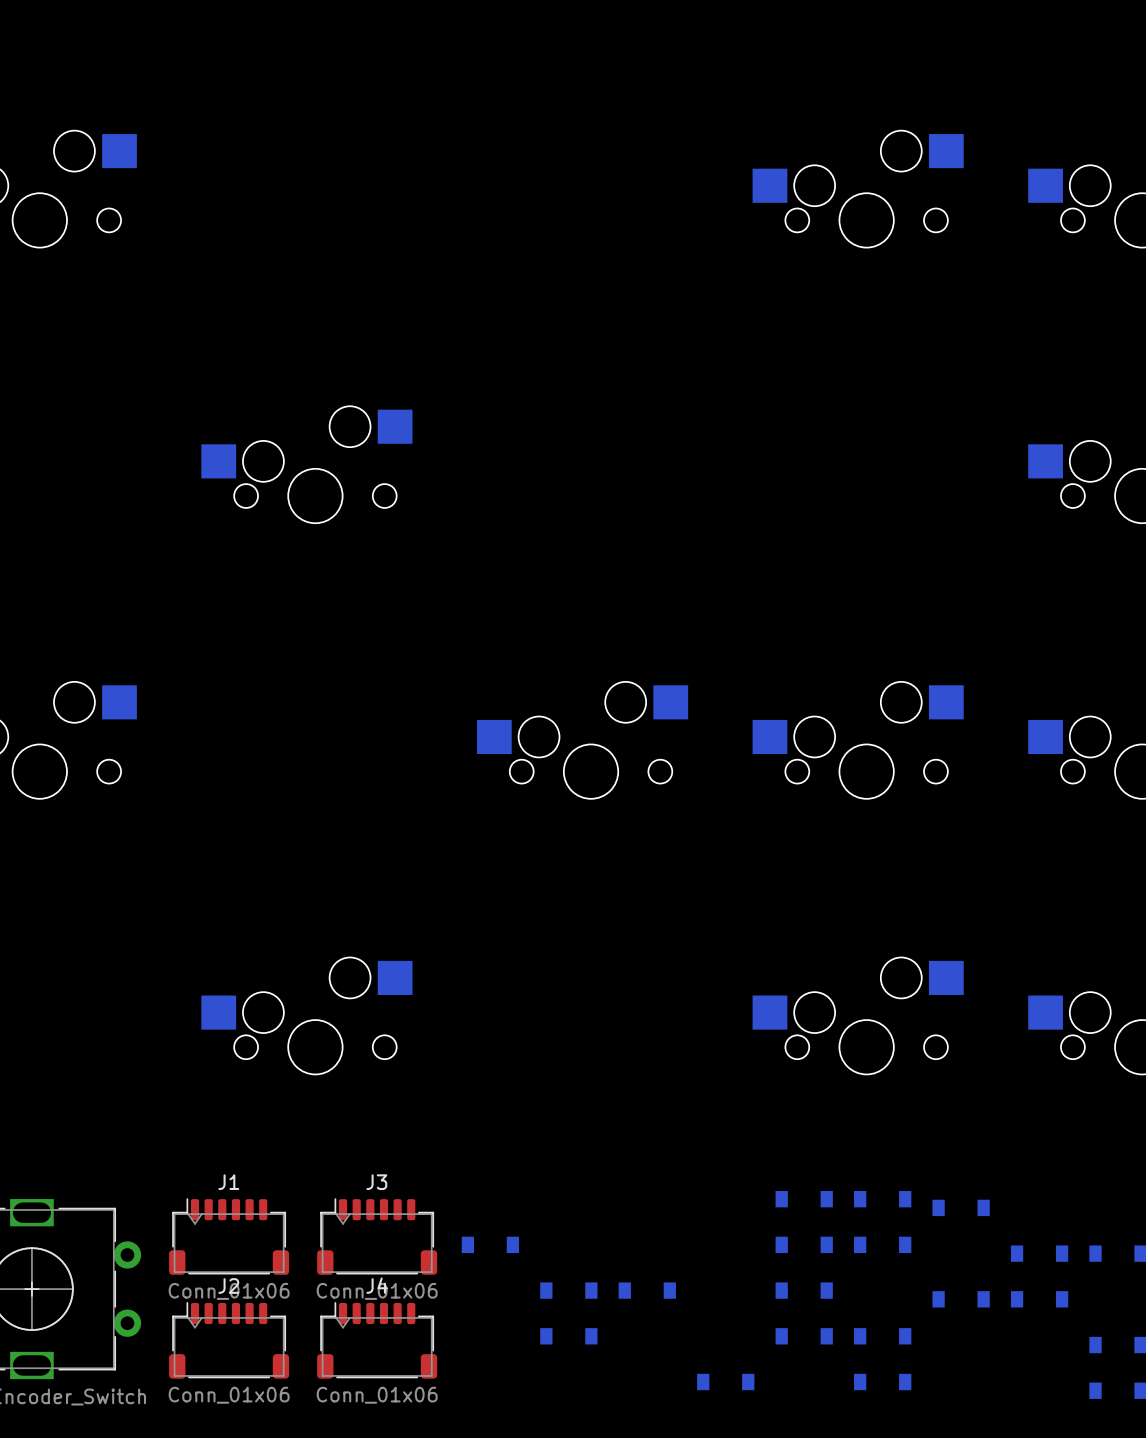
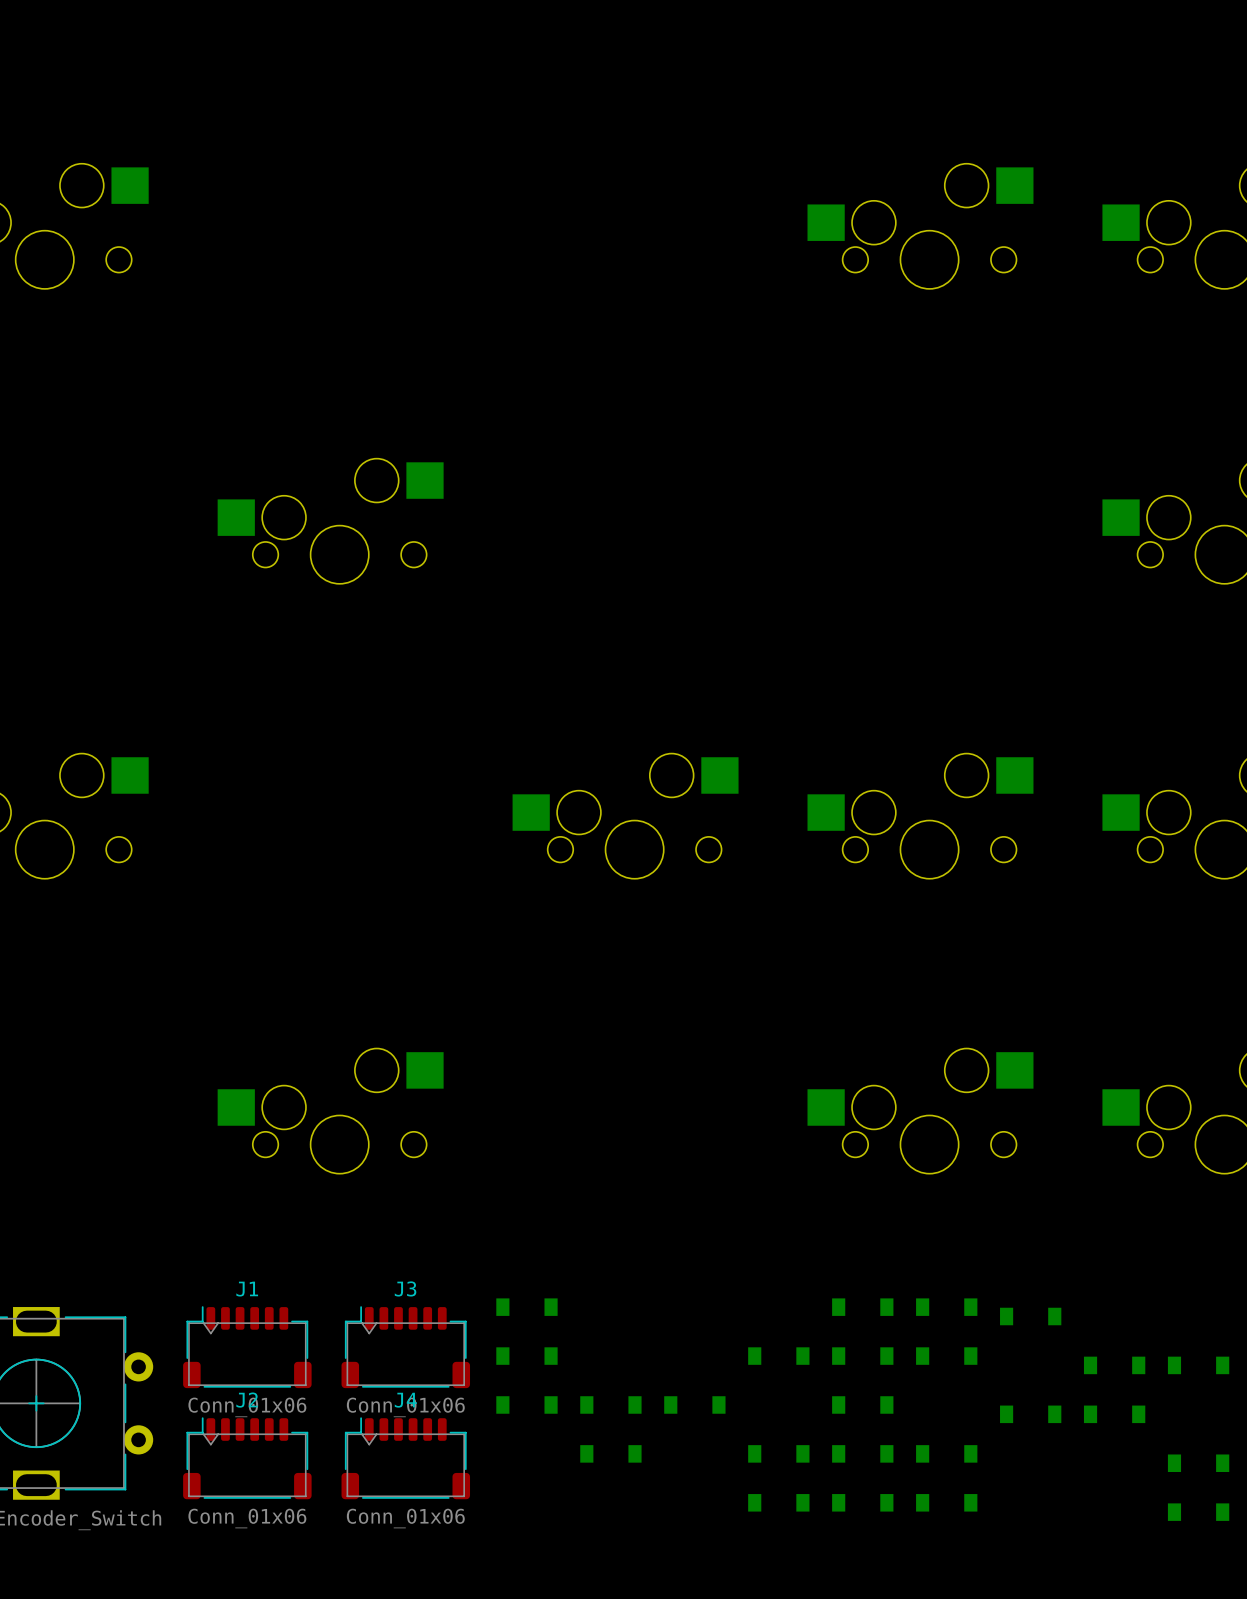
part: none -> (526, 1307)
part: none -> (778, 1356)
part: none -> (526, 1404)
part: none -> (778, 1453)
part: none -> (862, 1502)

